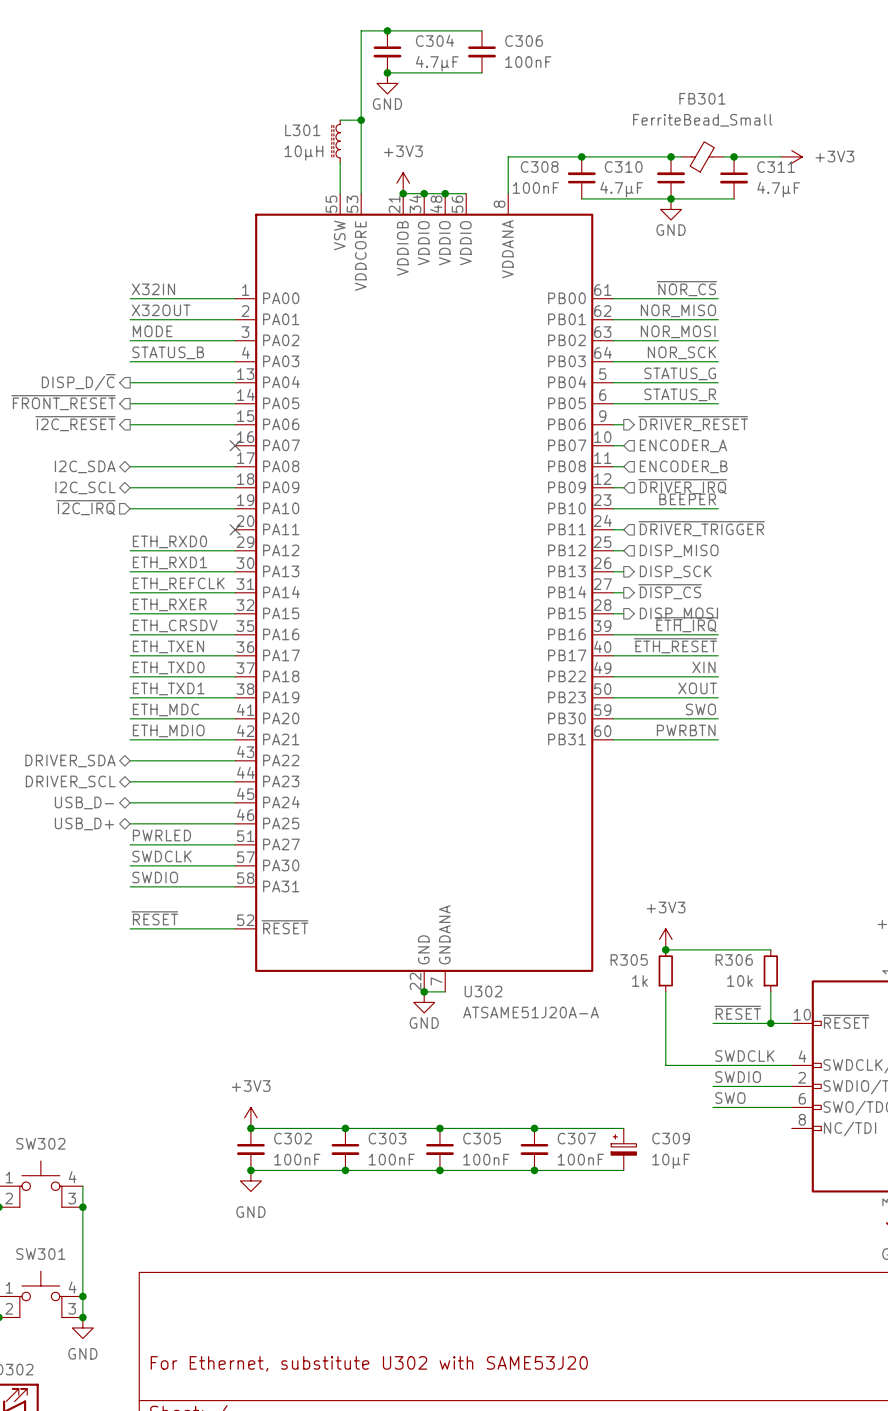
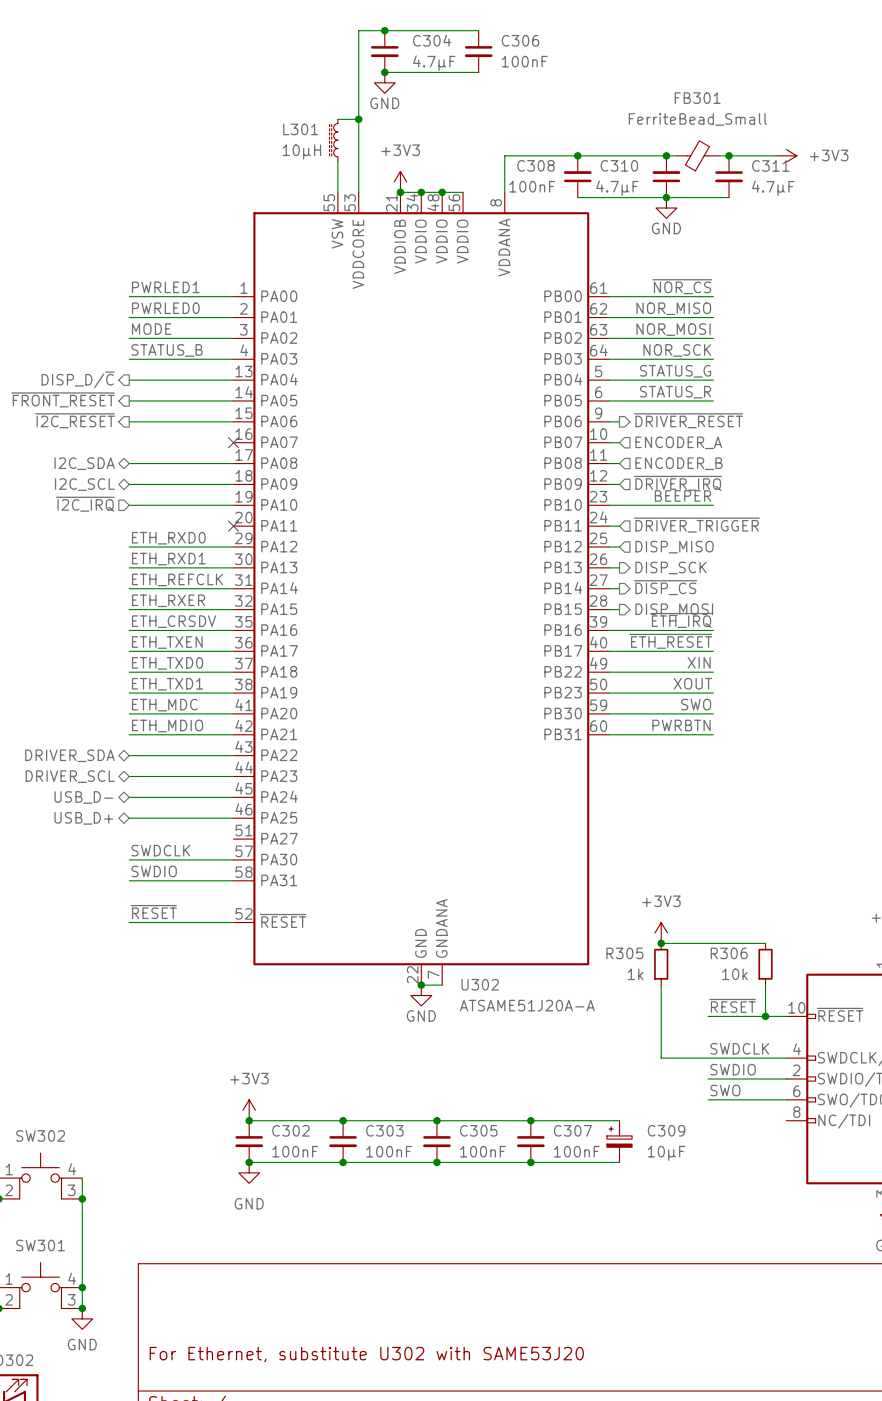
label: X32IN (153, 289) -> PWRLED1 (165, 287)
label: X32OUT (161, 310) -> PWRLED0 (165, 308)
label: PWRLED (161, 835) -> none
wire: (130, 844) (235, 844) -> none

